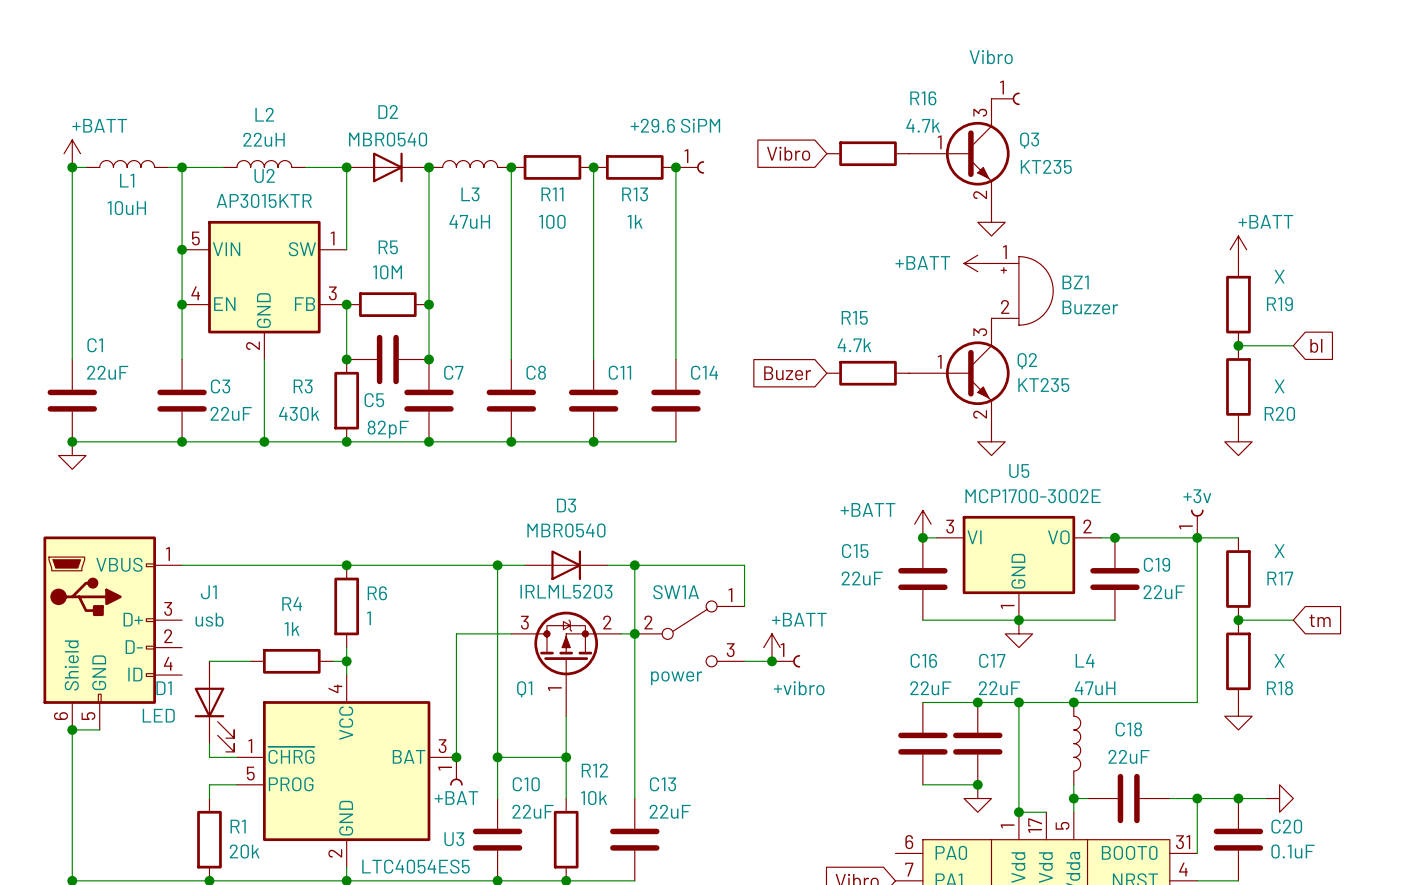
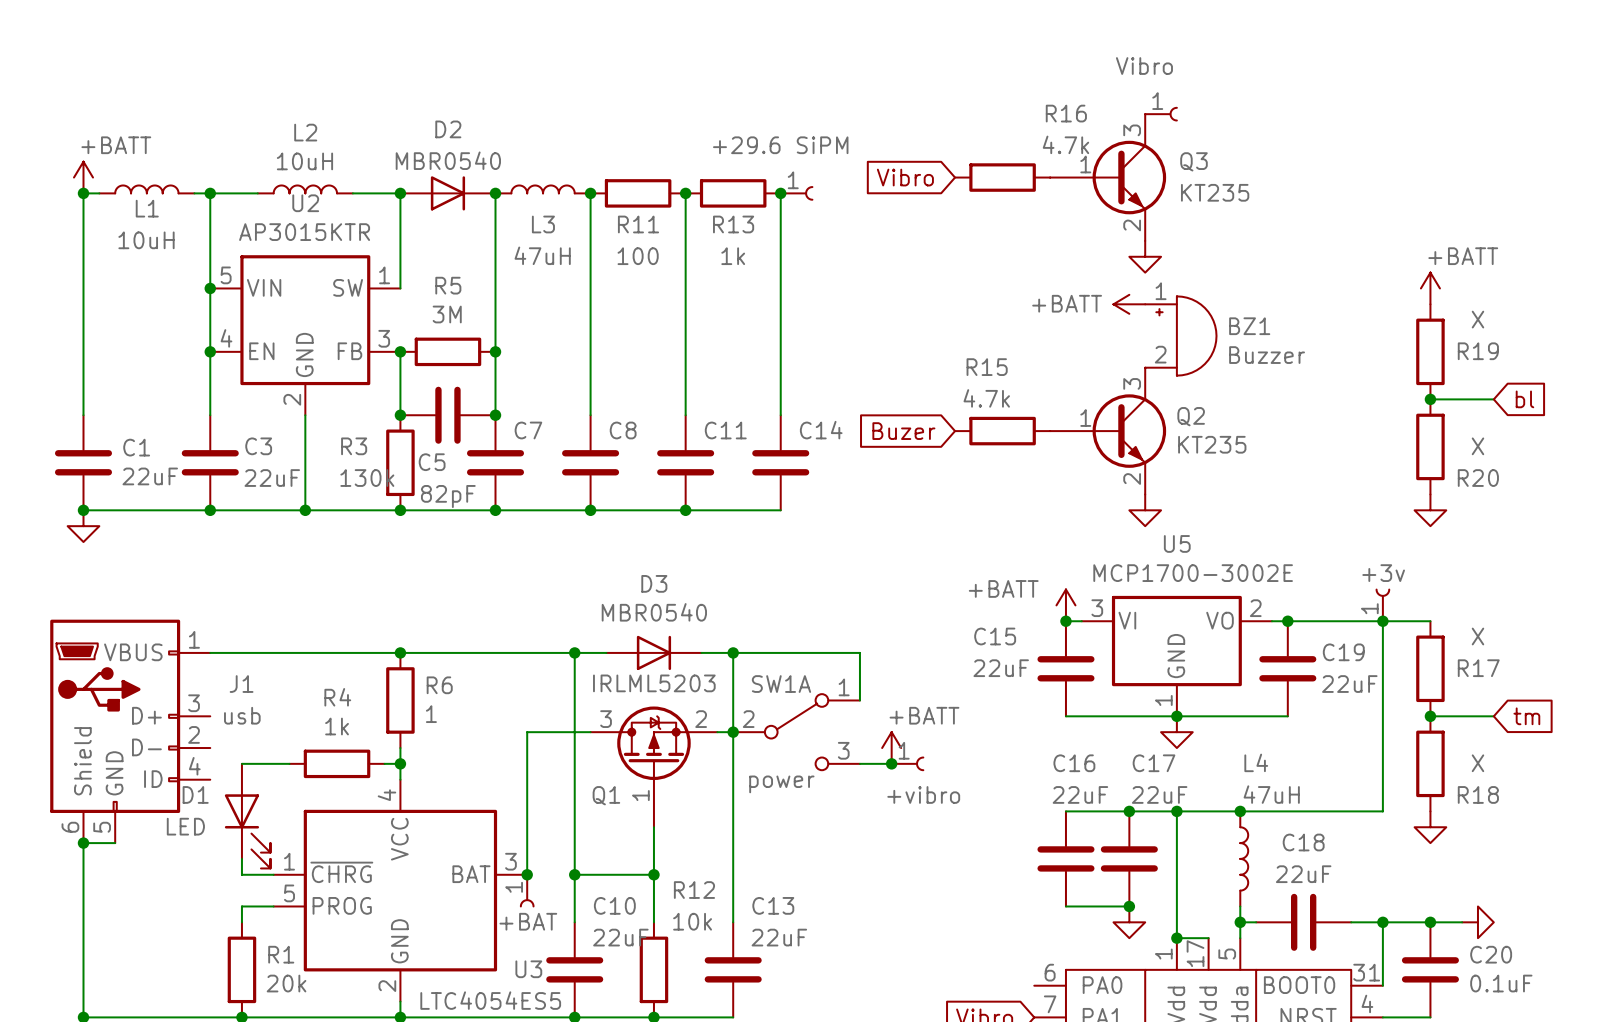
L2 value: 22uH (264, 139) -> 10uH (304, 161)
R5 value: 10M (387, 272) -> 3M (447, 314)
C1 name position: C1 (95, 345) -> C1 (136, 447)
C1 value position: 22uF (107, 372) -> 22uF (150, 476)
R3 value: 430k (299, 413) -> 130k (367, 478)

